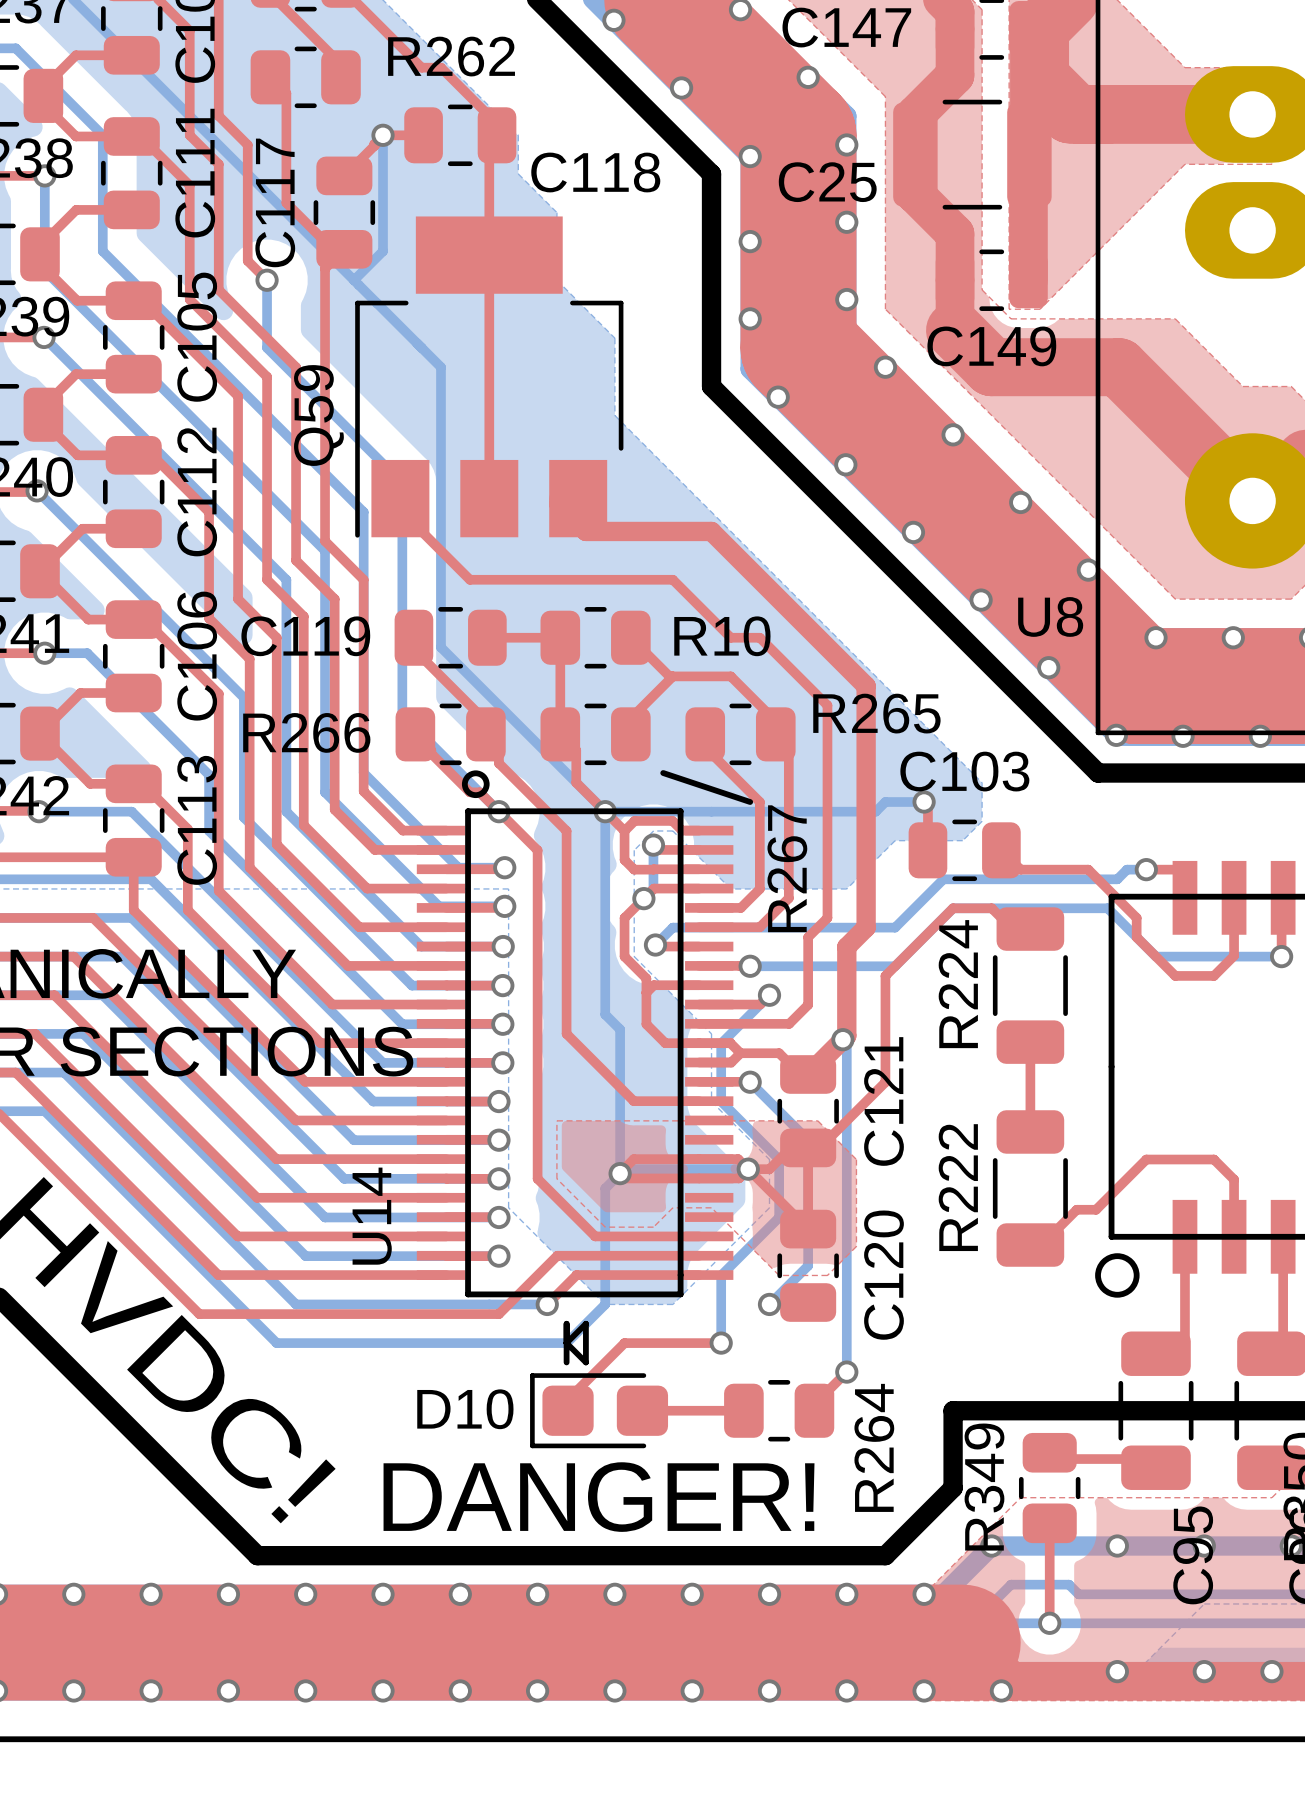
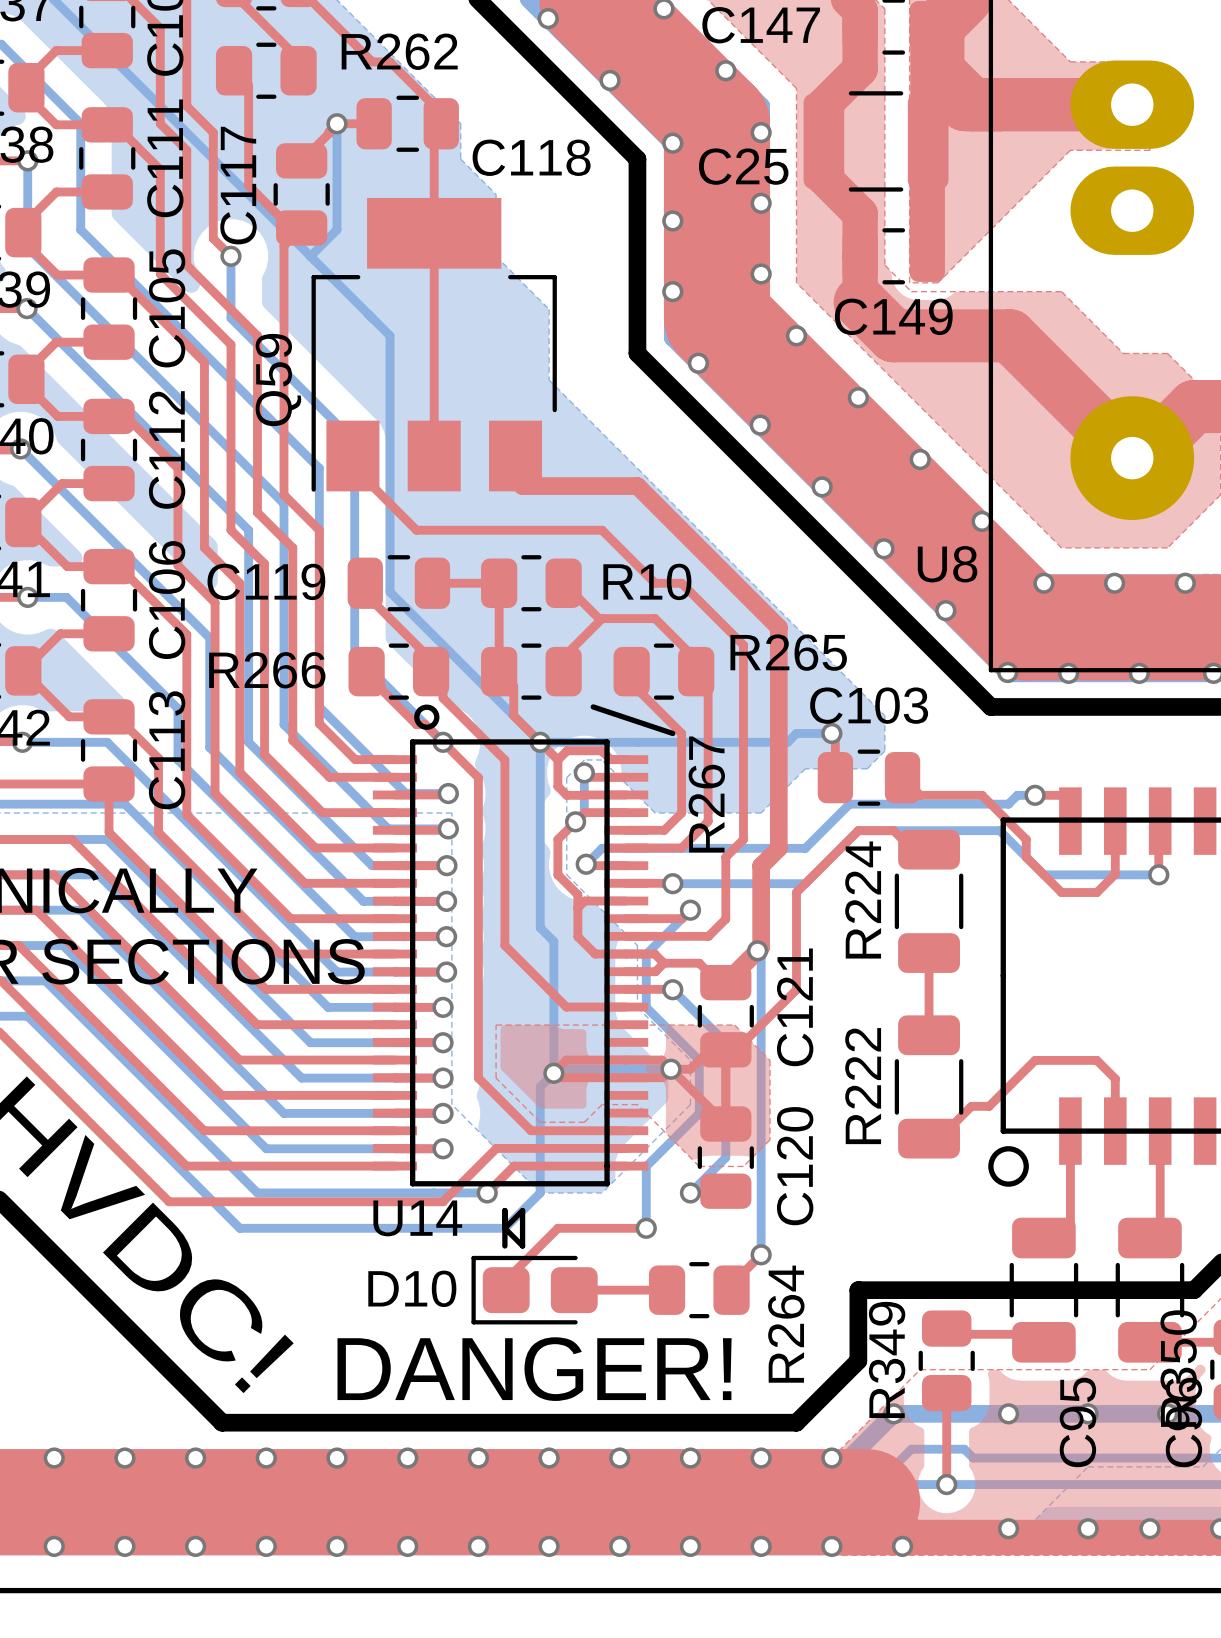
U14 footprint: [416, 770, 734, 1298] -> [372, 704, 649, 1187]
U14 name rotation: 0° (372, 1216) -> 90° clockwise (417, 1218)
U14 name position: U14 (372, 1216) -> U14 (417, 1218)

